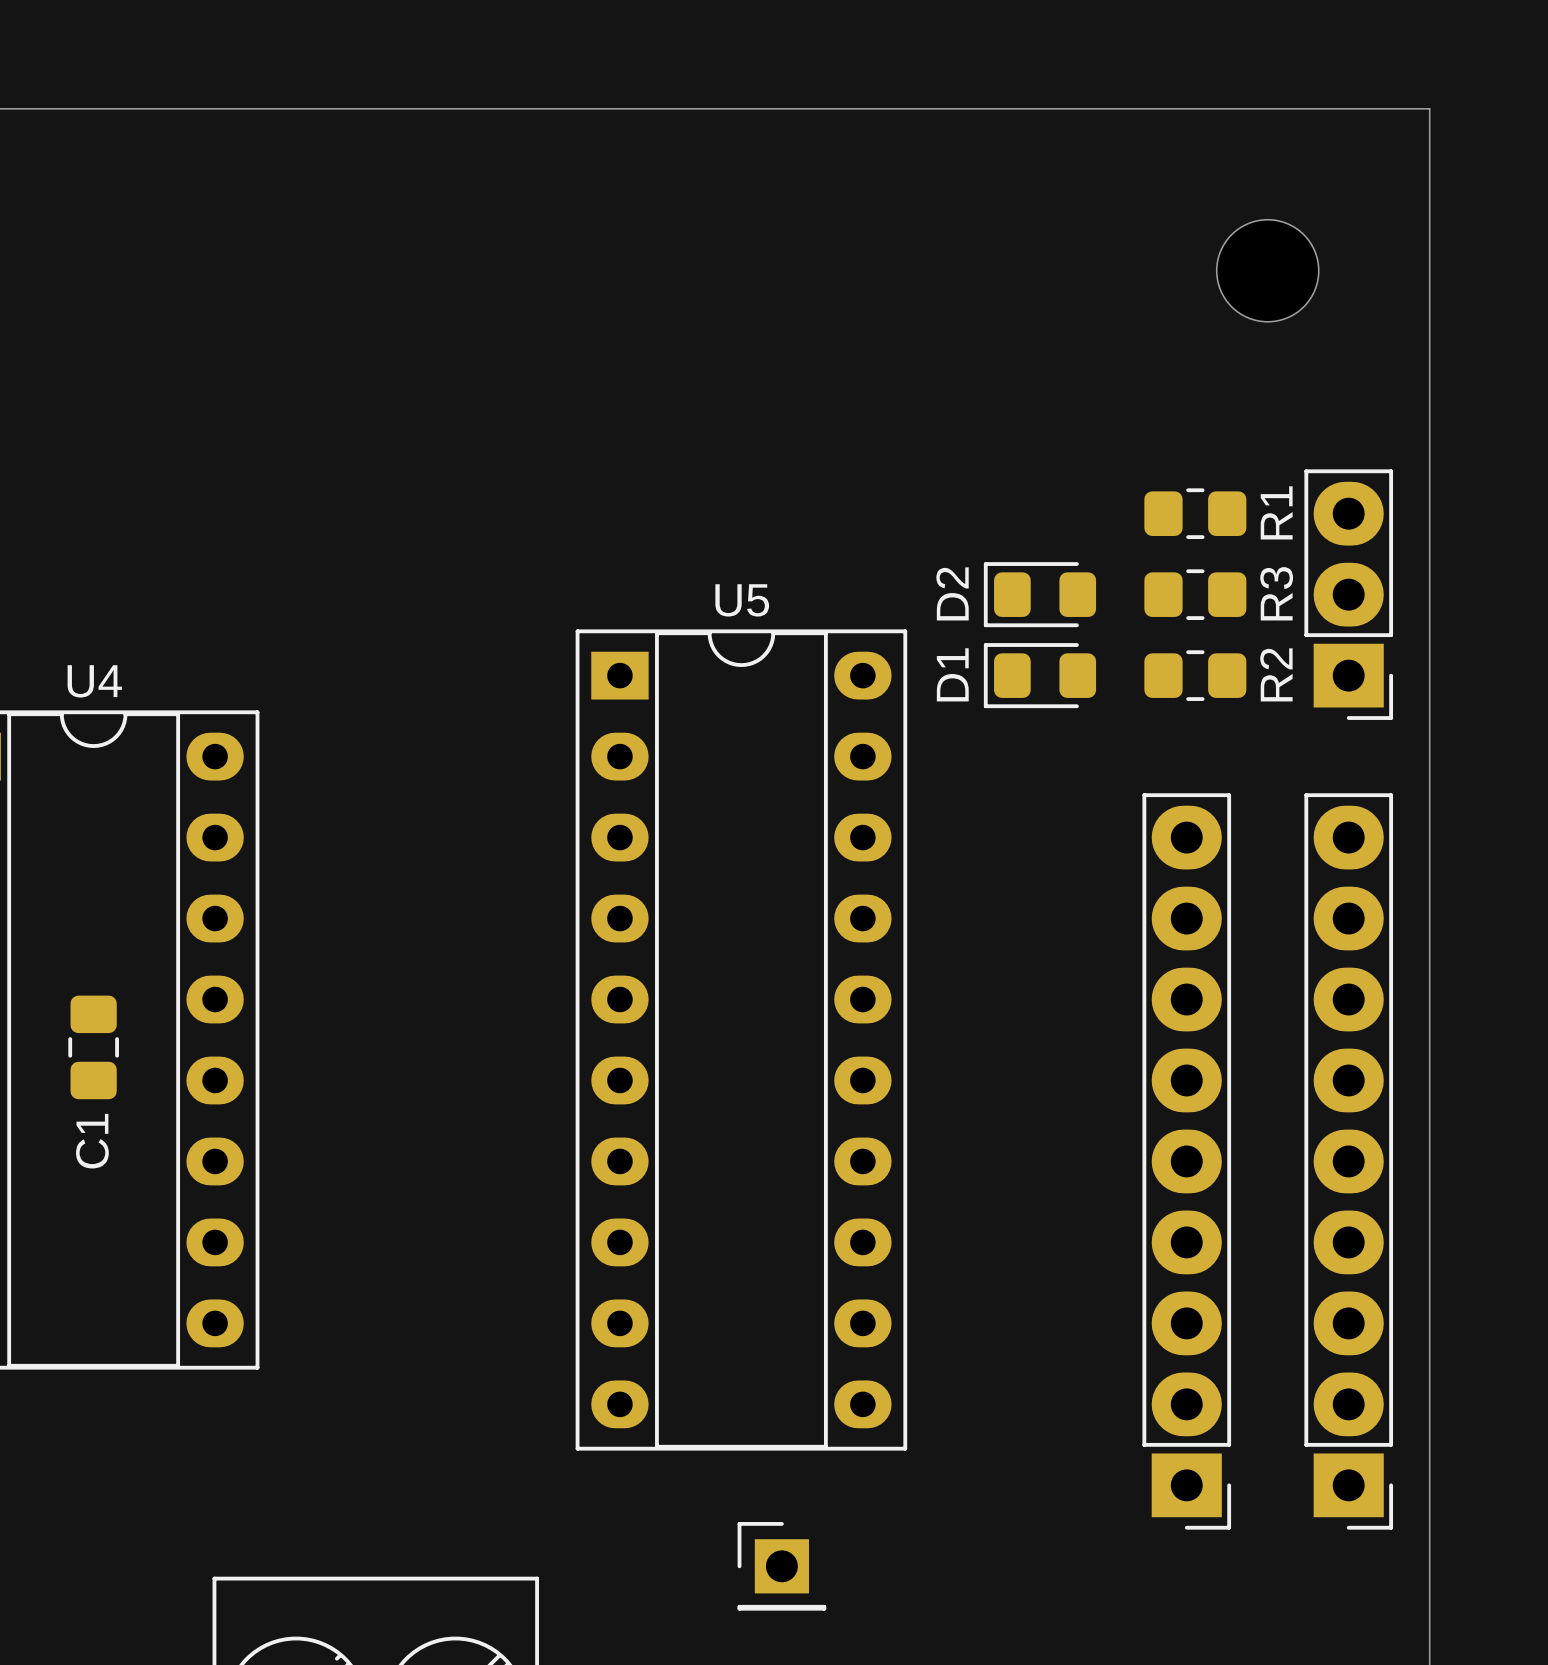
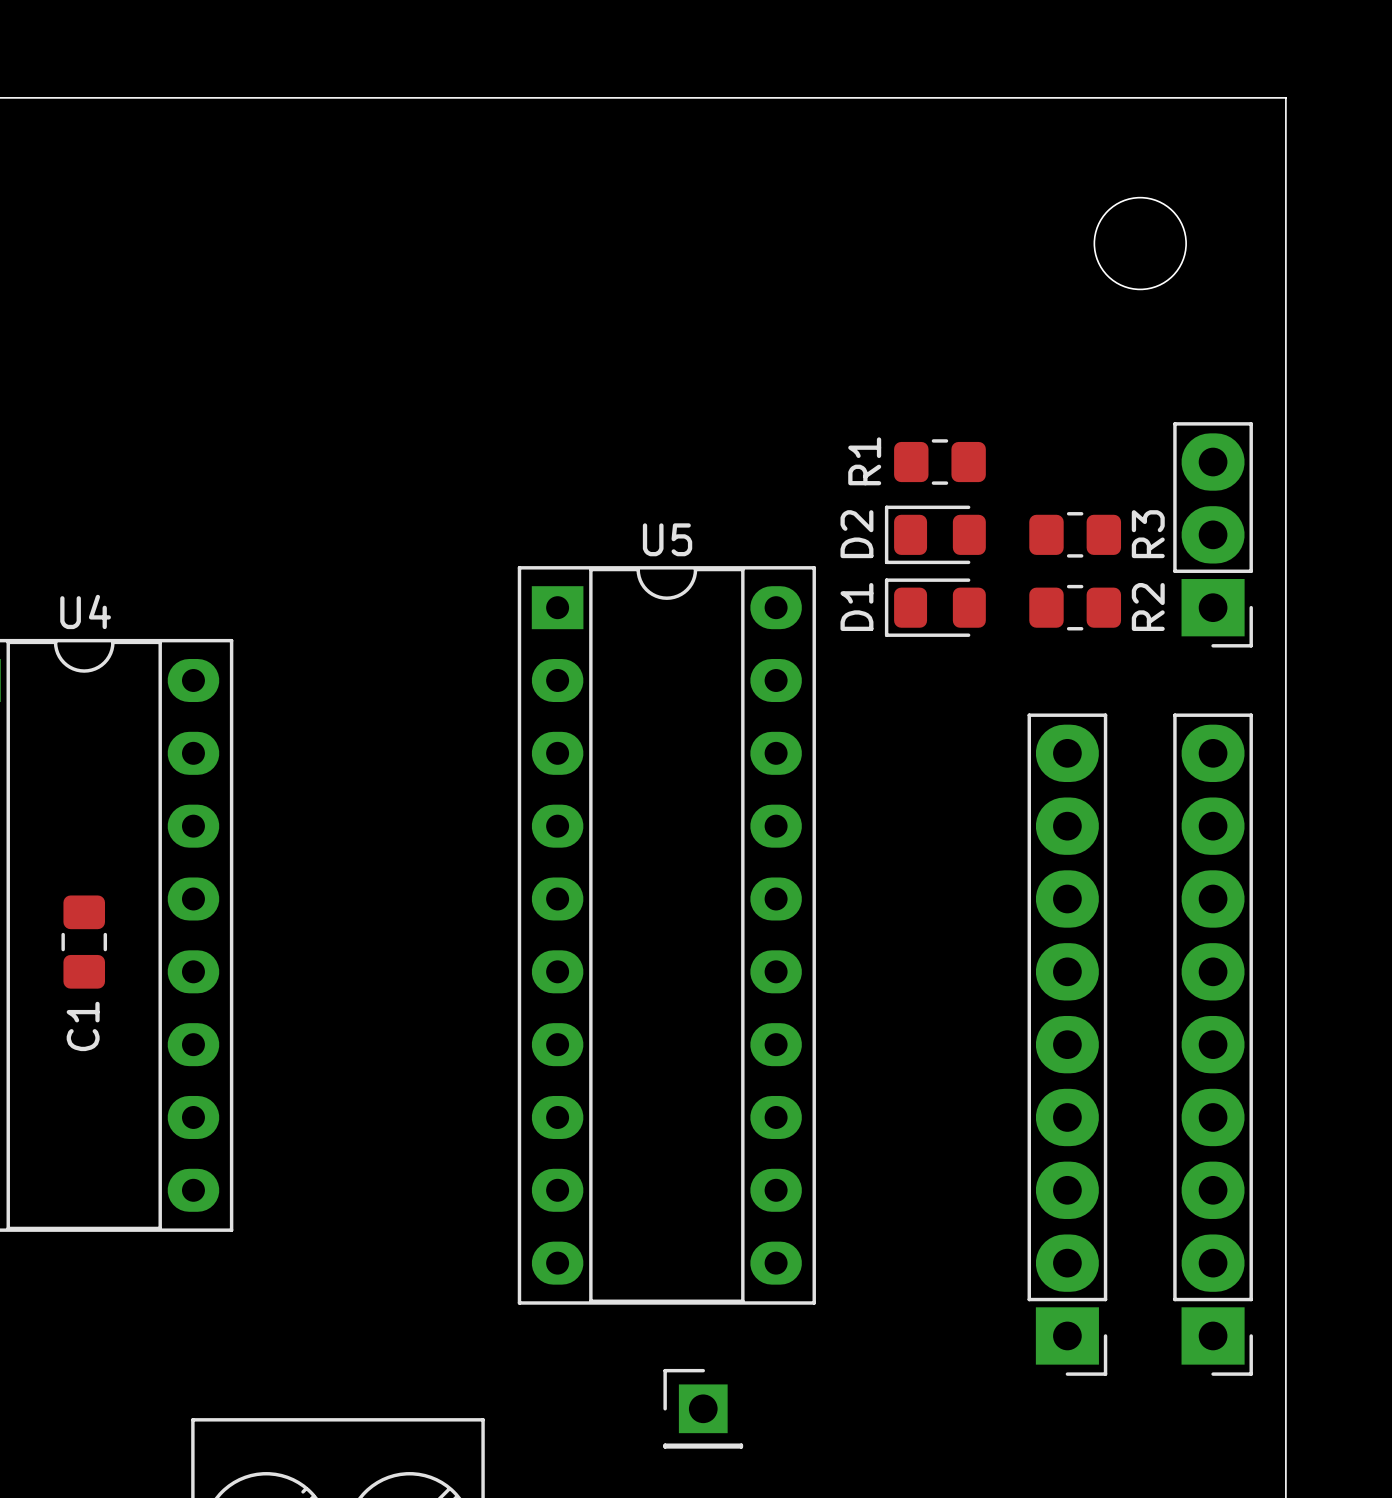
R1 name position: R1 (1276, 512) -> R1 (864, 461)
R1 position: (1195, 513) -> (939, 462)

